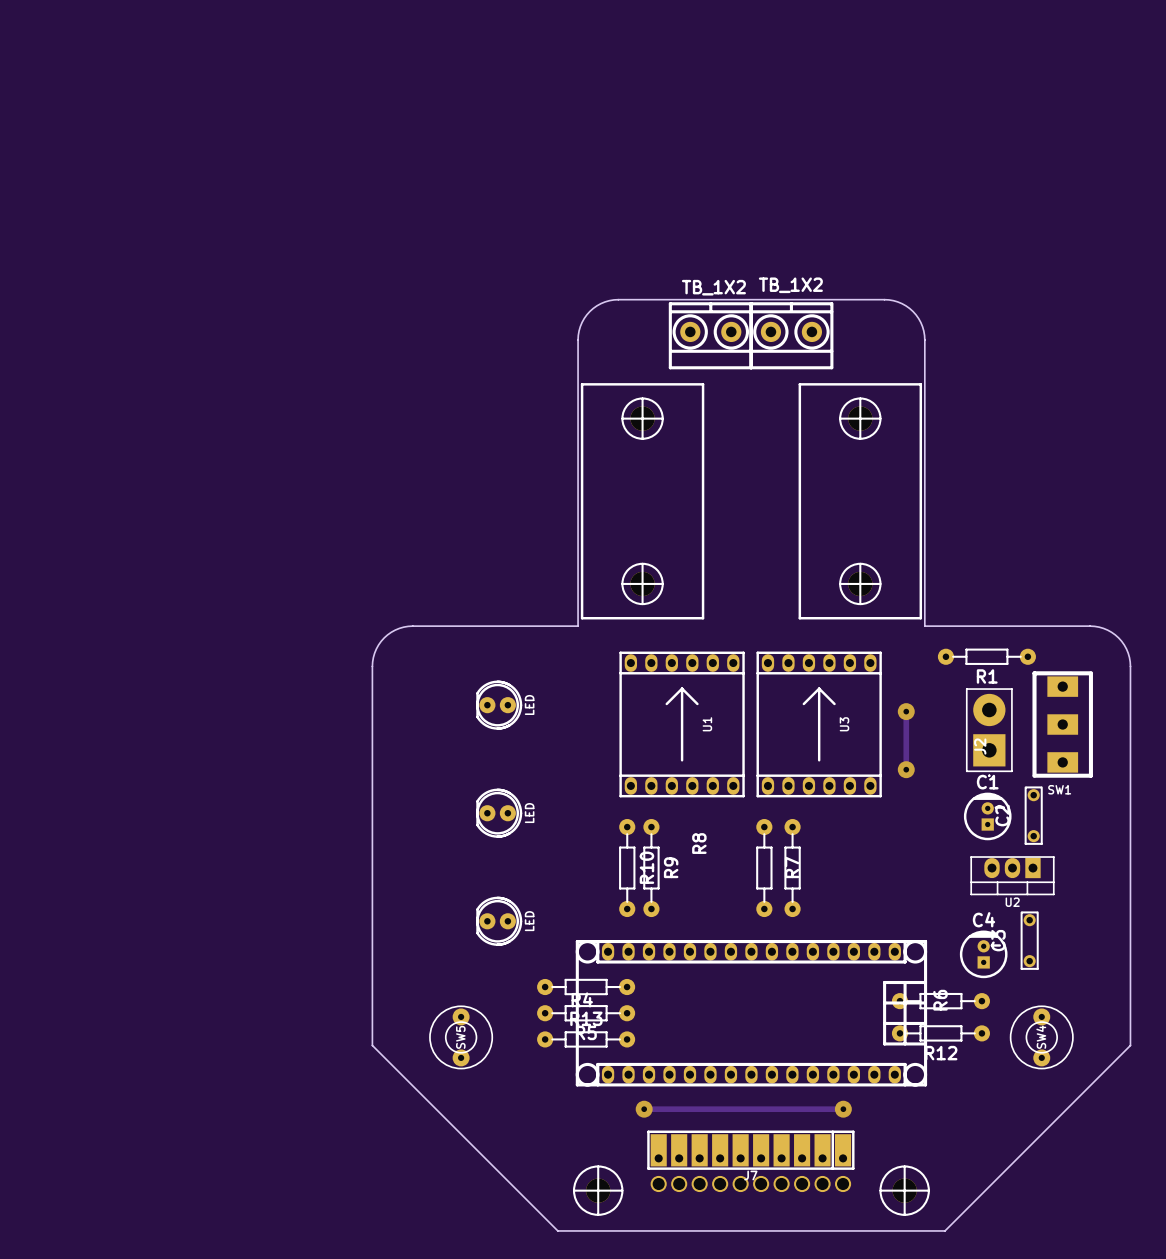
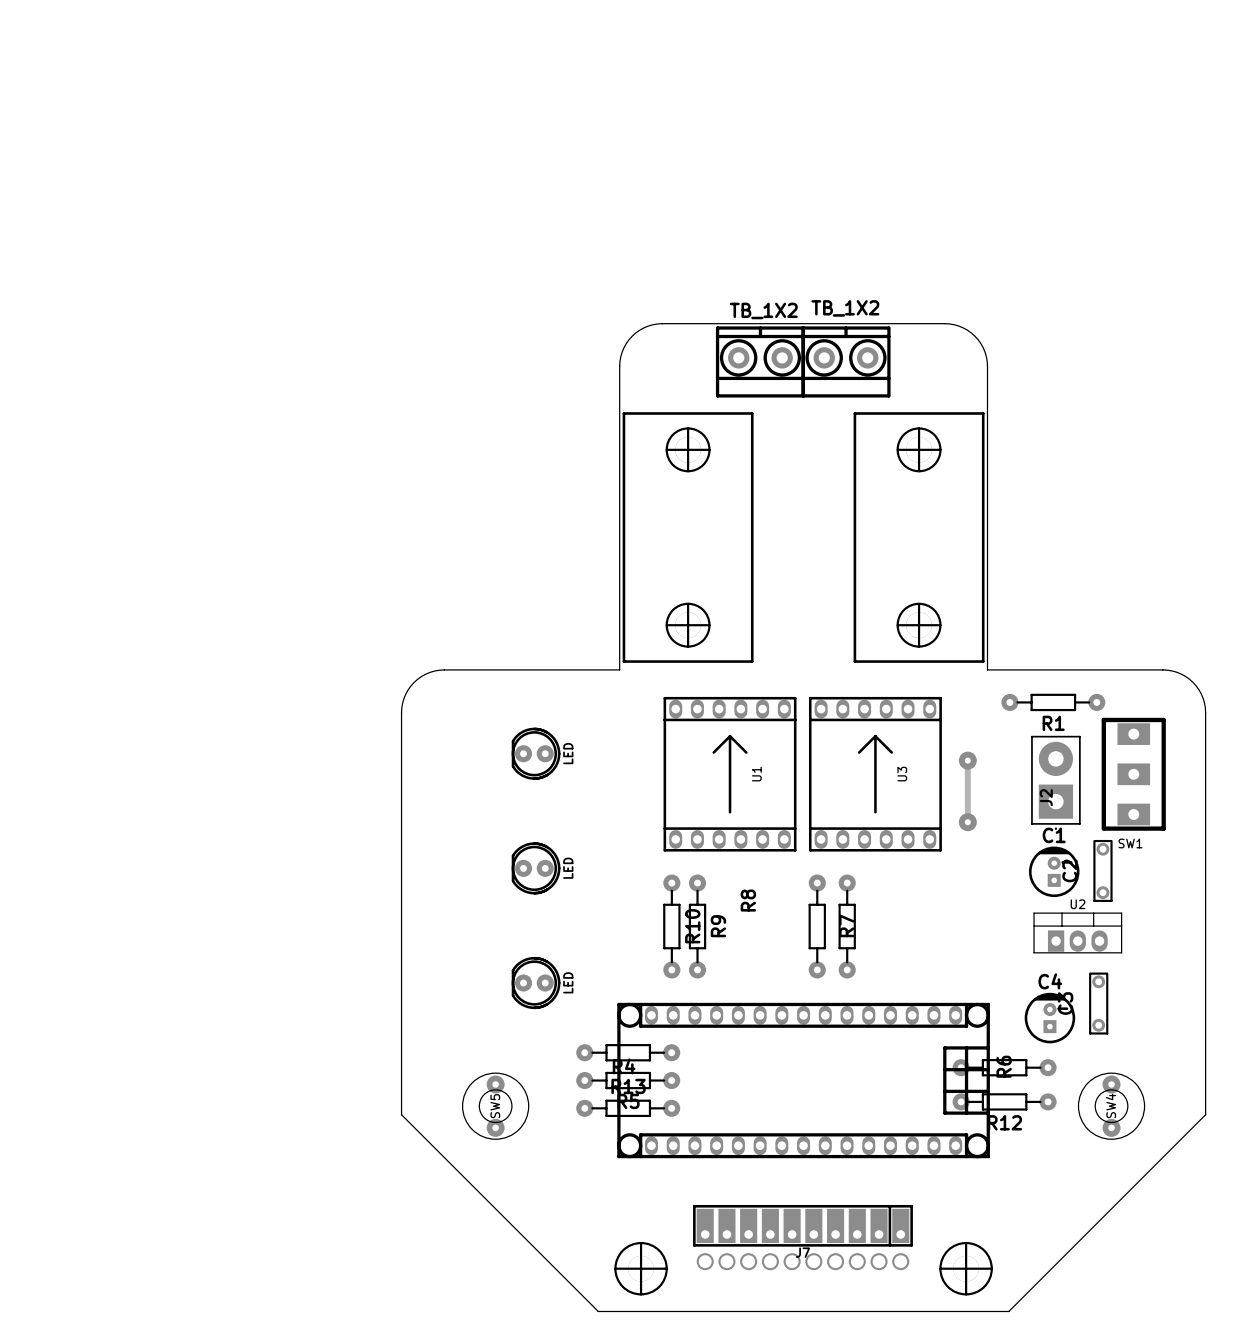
U2 rotation: 0° (1012, 875) -> 180° (1077, 932)
track: (644, 1109) (843, 1109) -> none
via: (644, 1109) -> none
via: (843, 1109) -> none

